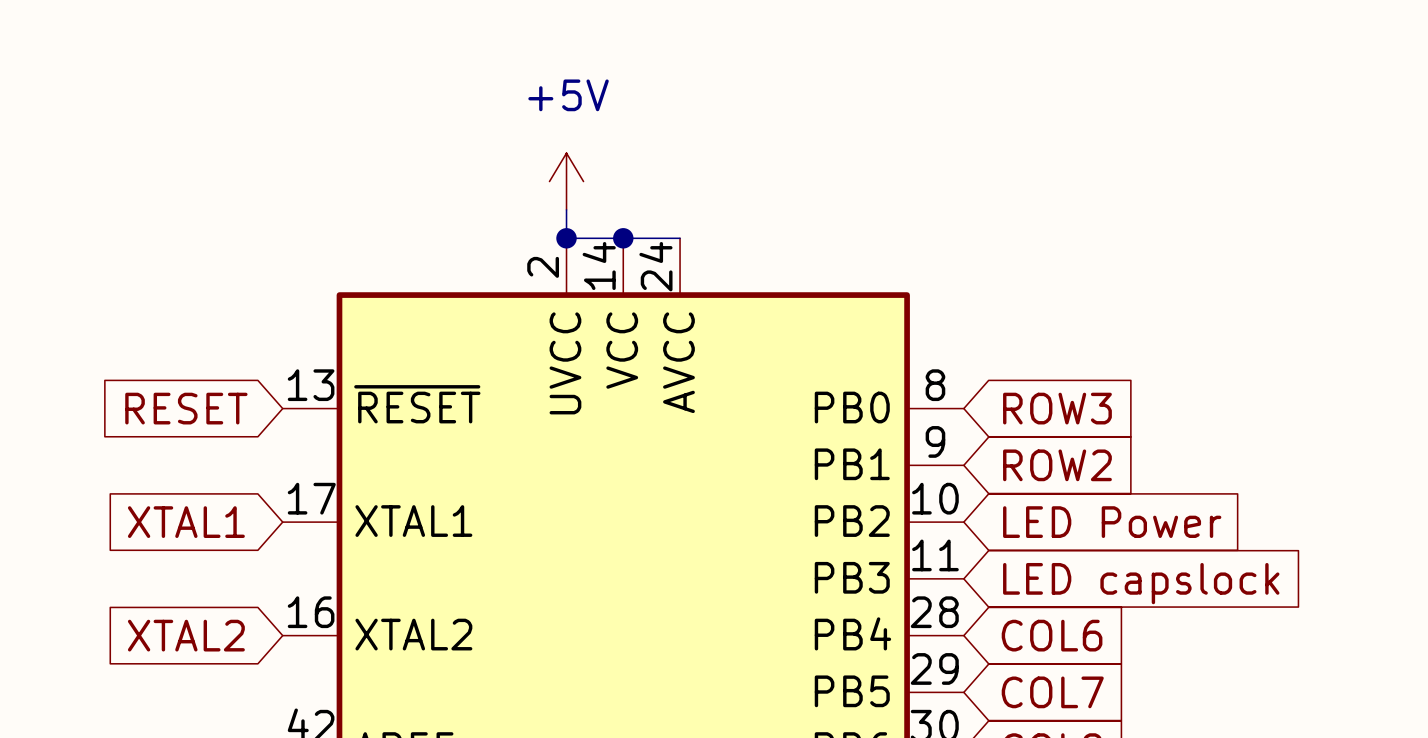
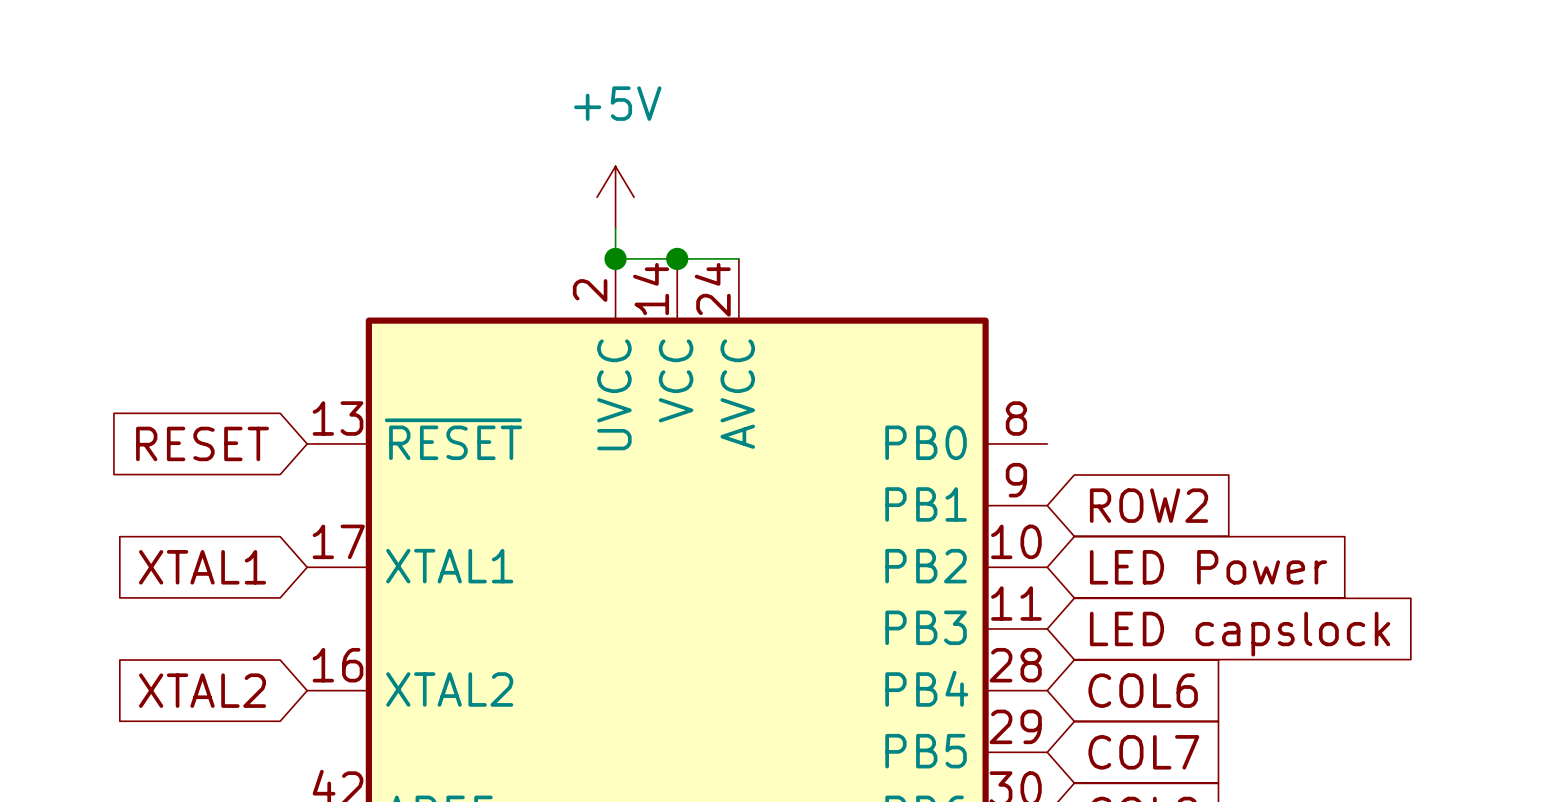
global label: ROW3 (1057, 408) -> none

